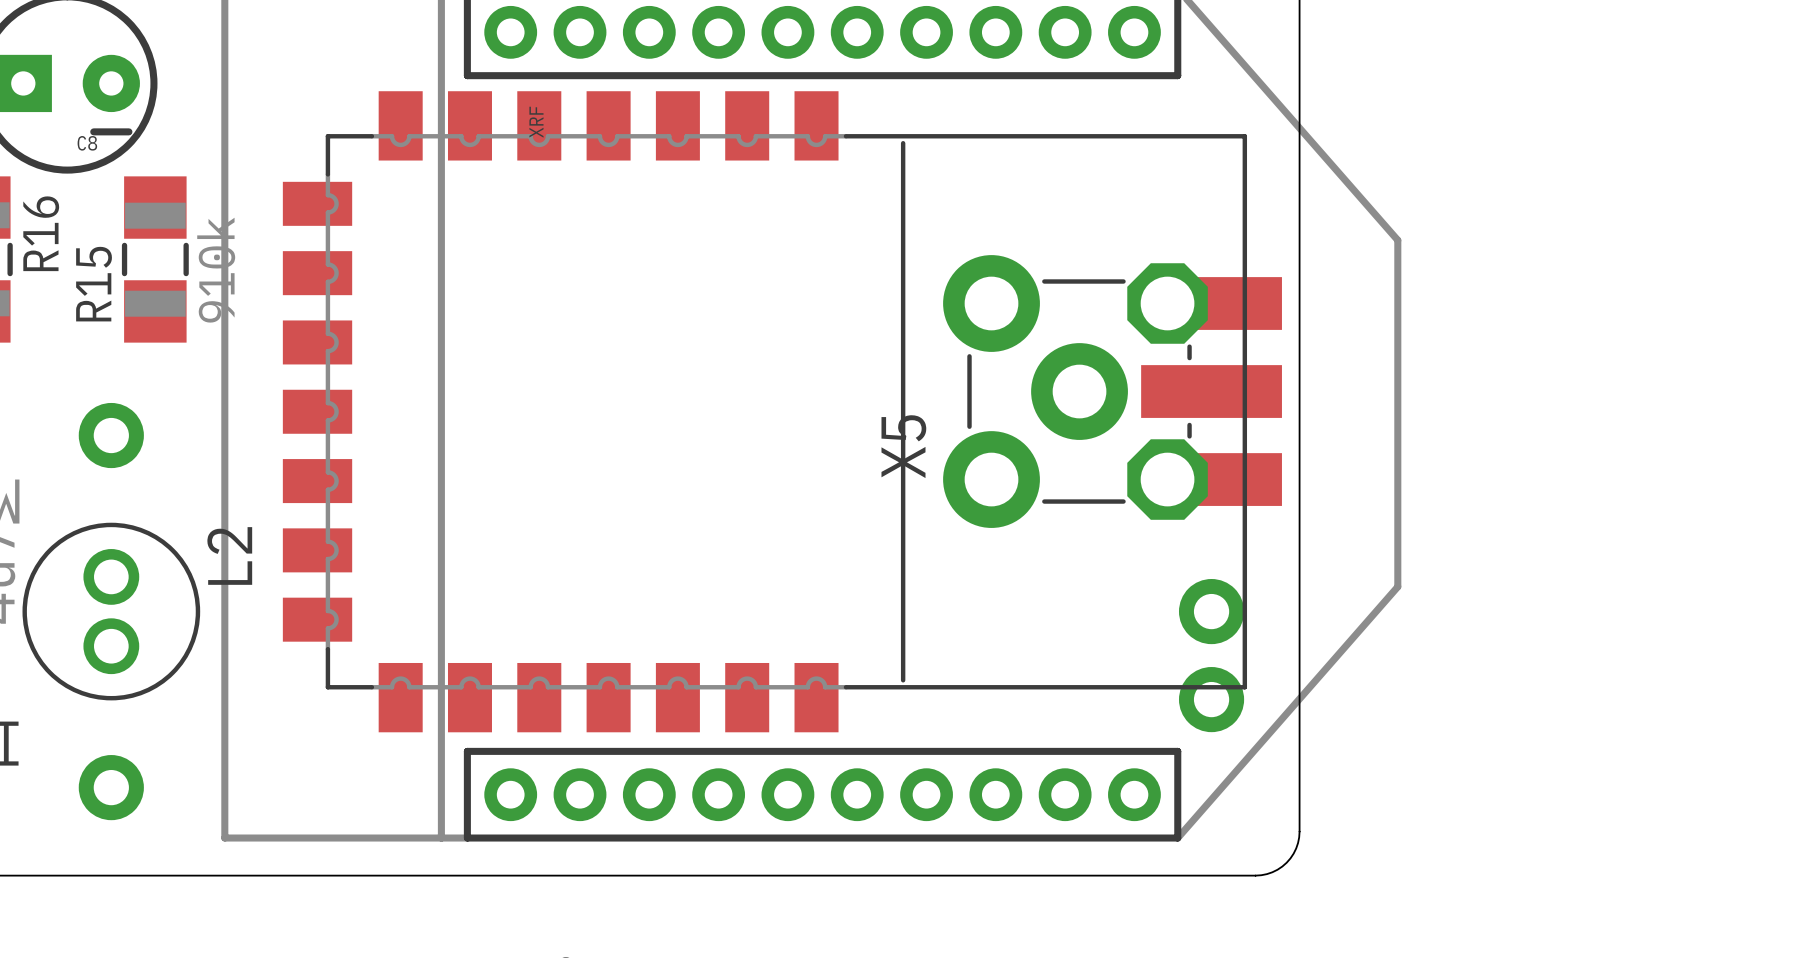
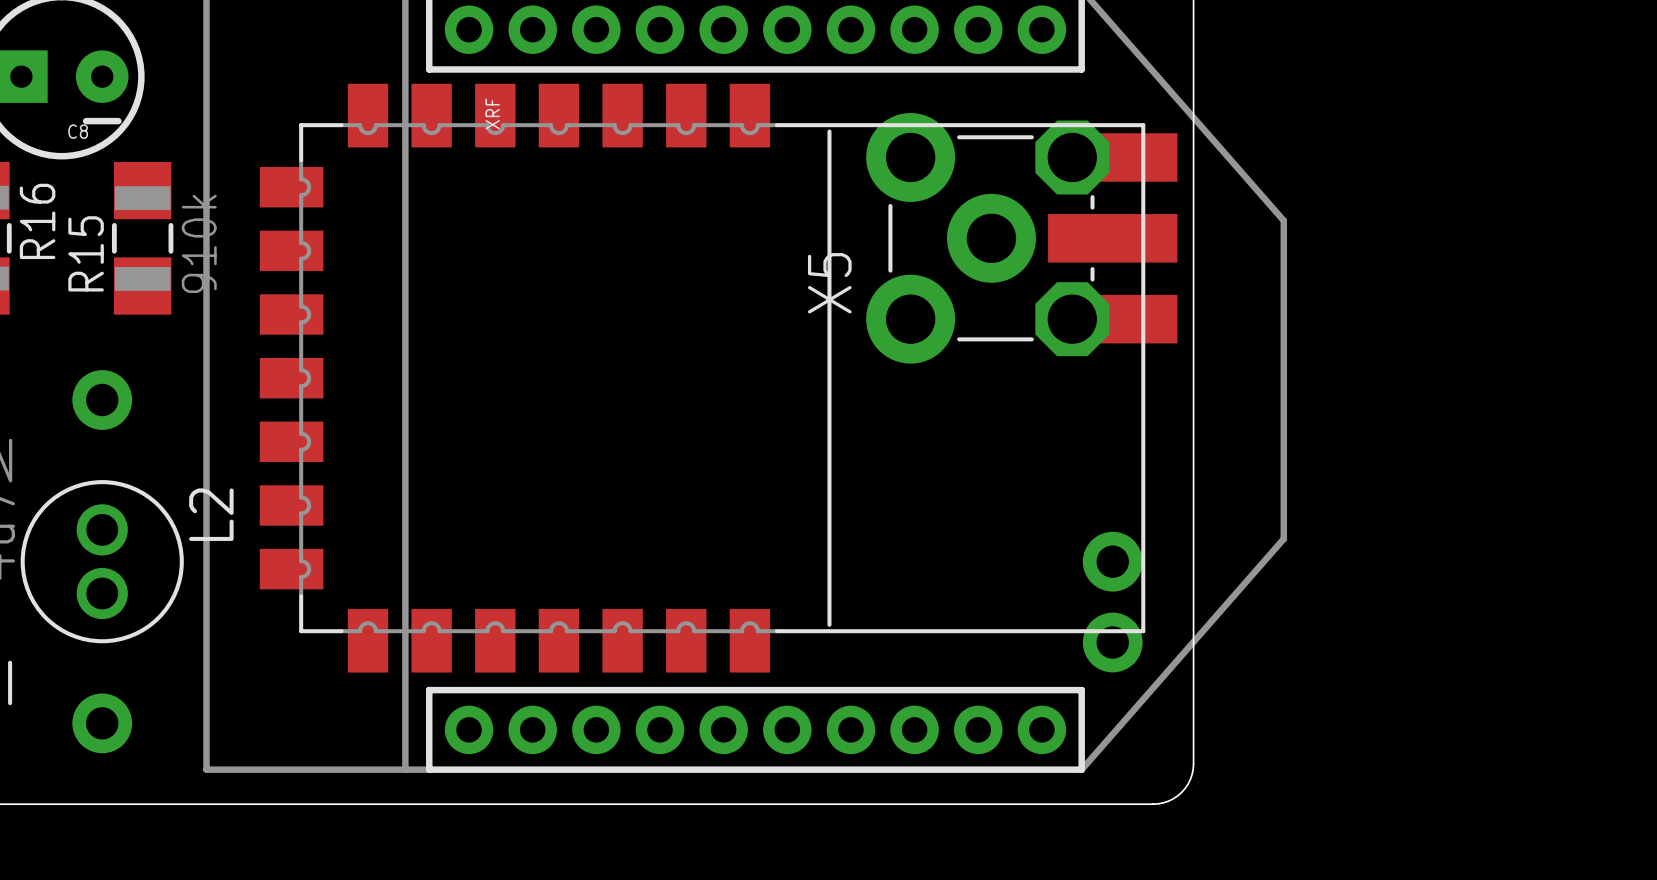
X5 position: (1112, 391) -> (1021, 238)

